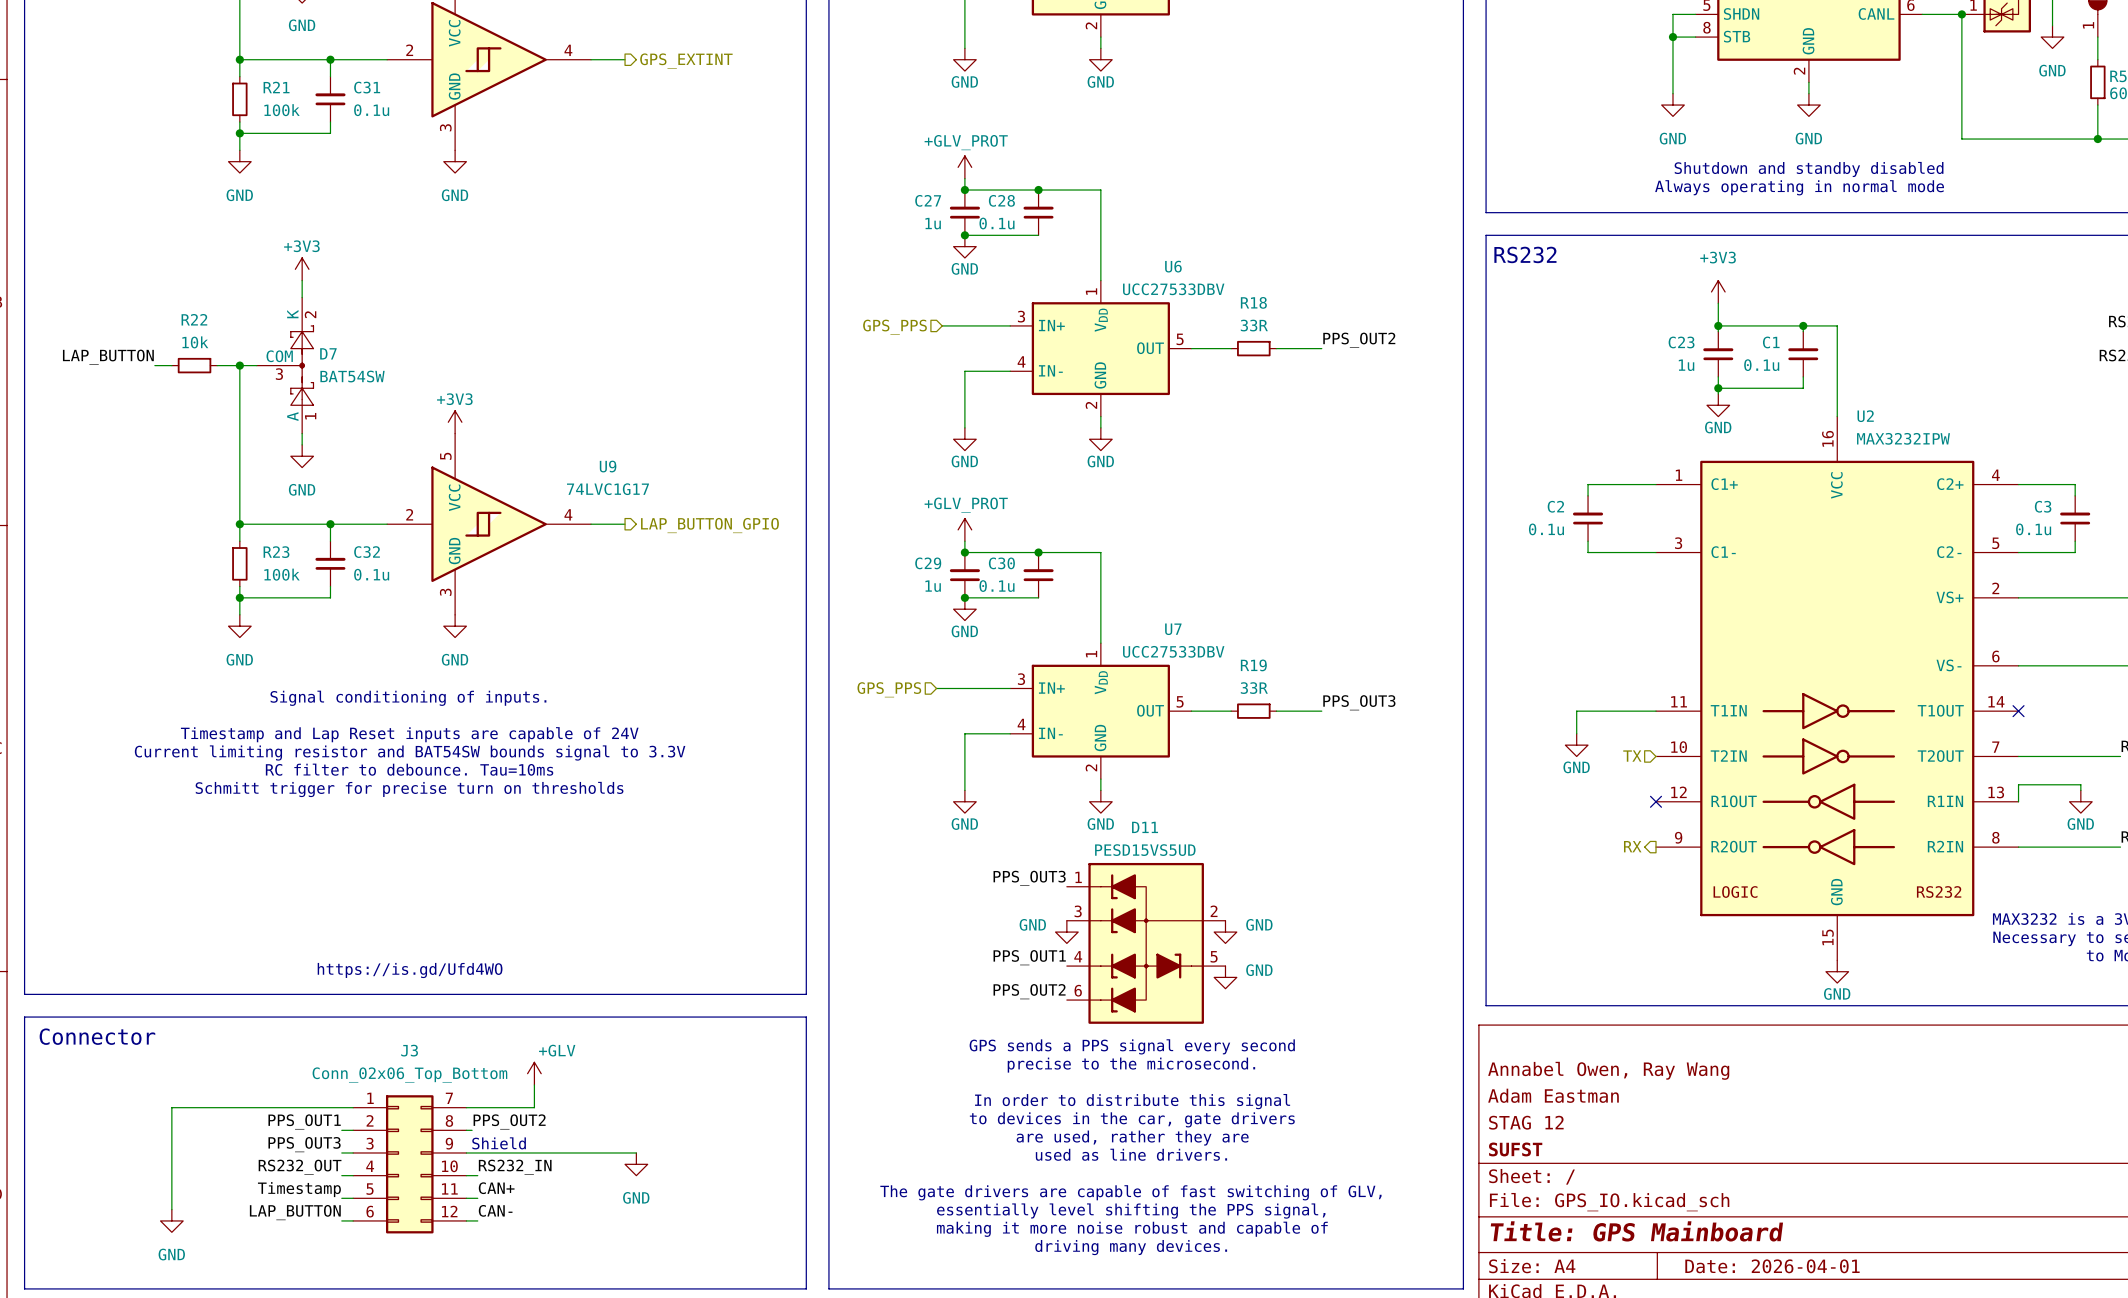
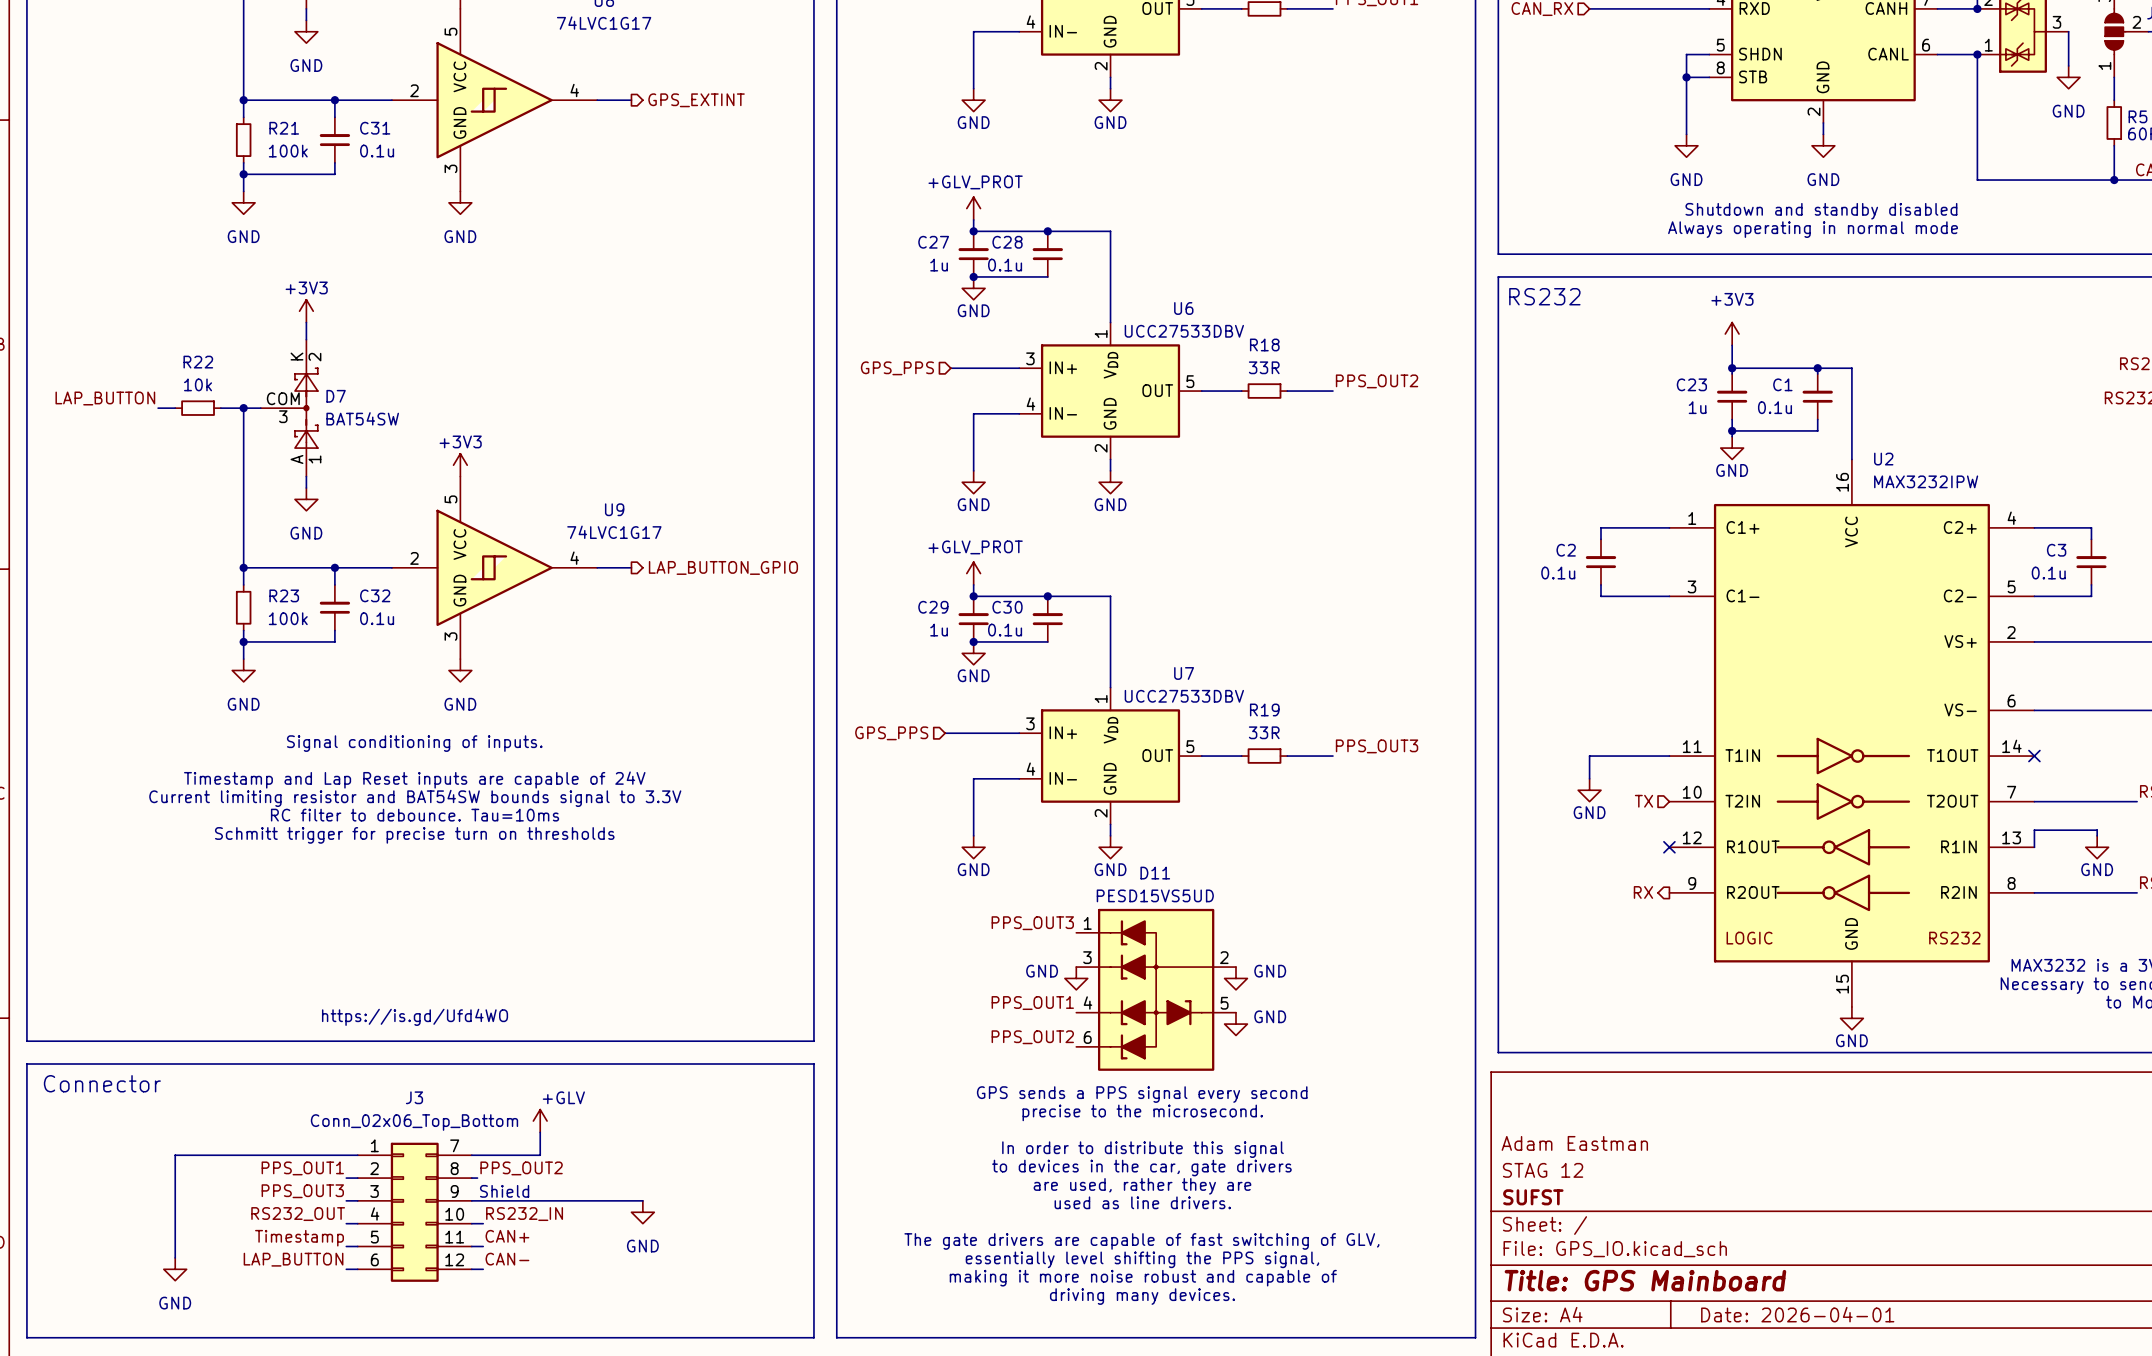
title block: Annabel Owen, Ray Wang (1608, 1070) -> none

